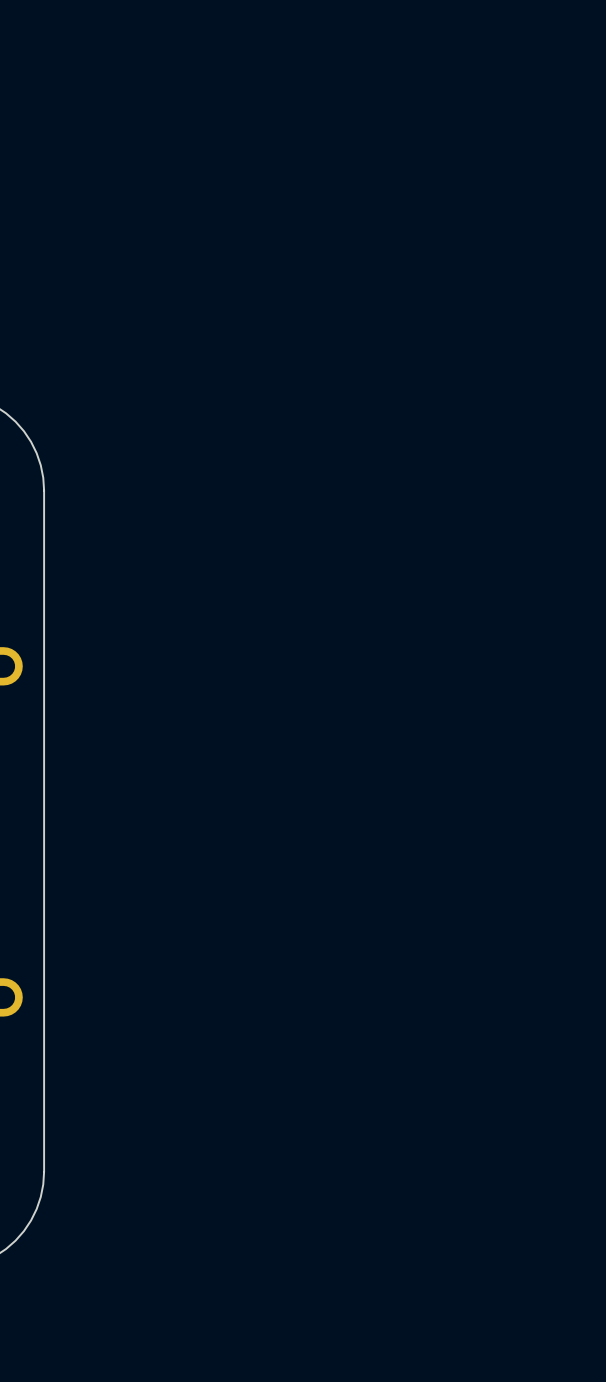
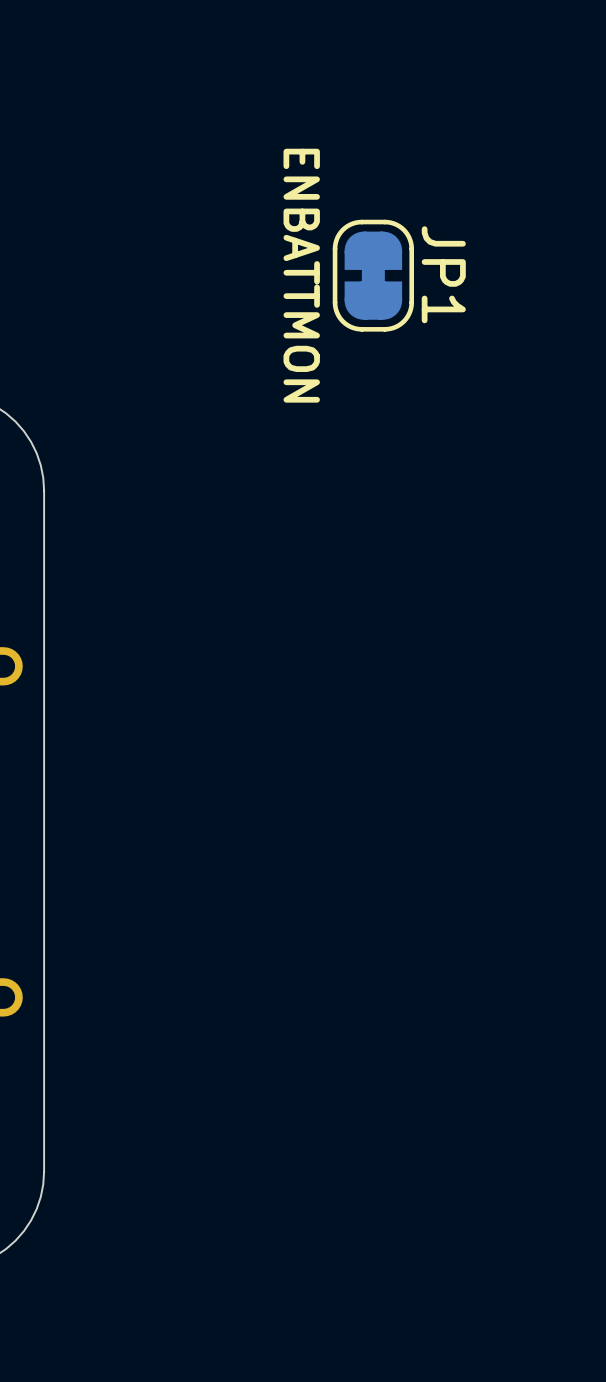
JP1: none -> ENBATTMON (373, 275)

